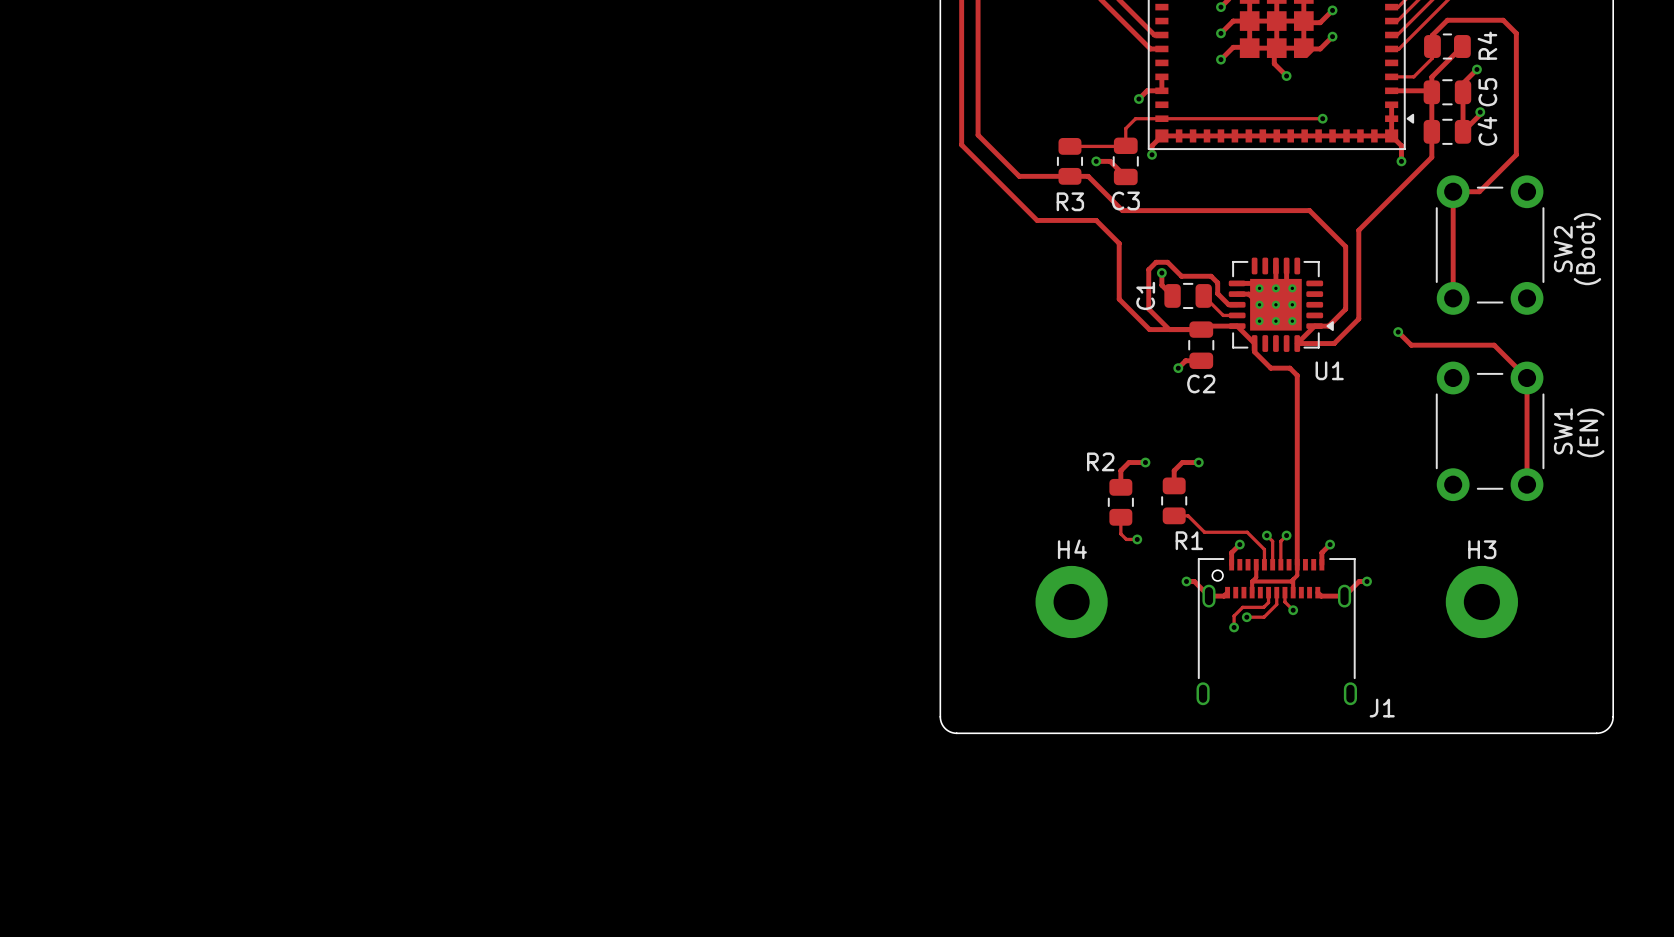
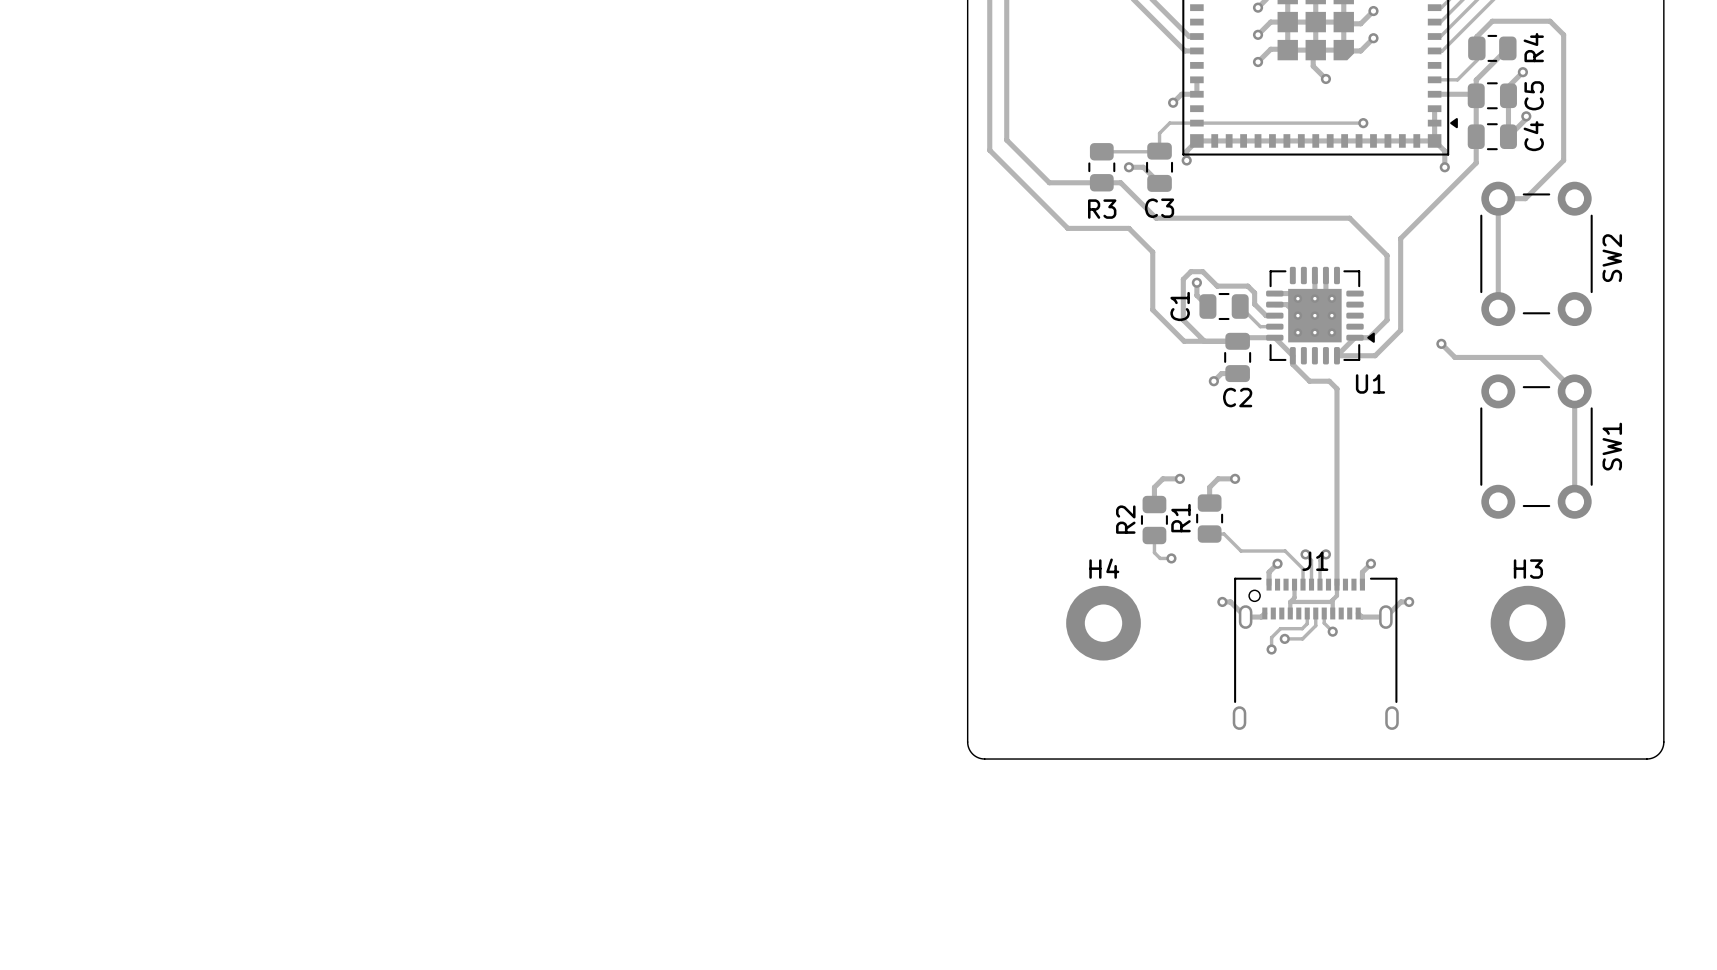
text: (Boot) (1587, 249) -> none
text: (EN) (1590, 432) -> none
R2 name rotation: 0° (1100, 461) -> 90° counterclockwise (1125, 519)
R1 name rotation: 0° (1189, 540) -> 90° counterclockwise (1180, 518)
R1 name position: R1 (1189, 540) -> R1 (1180, 518)
J1 name position: J1 (1382, 708) -> J1 (1315, 561)

